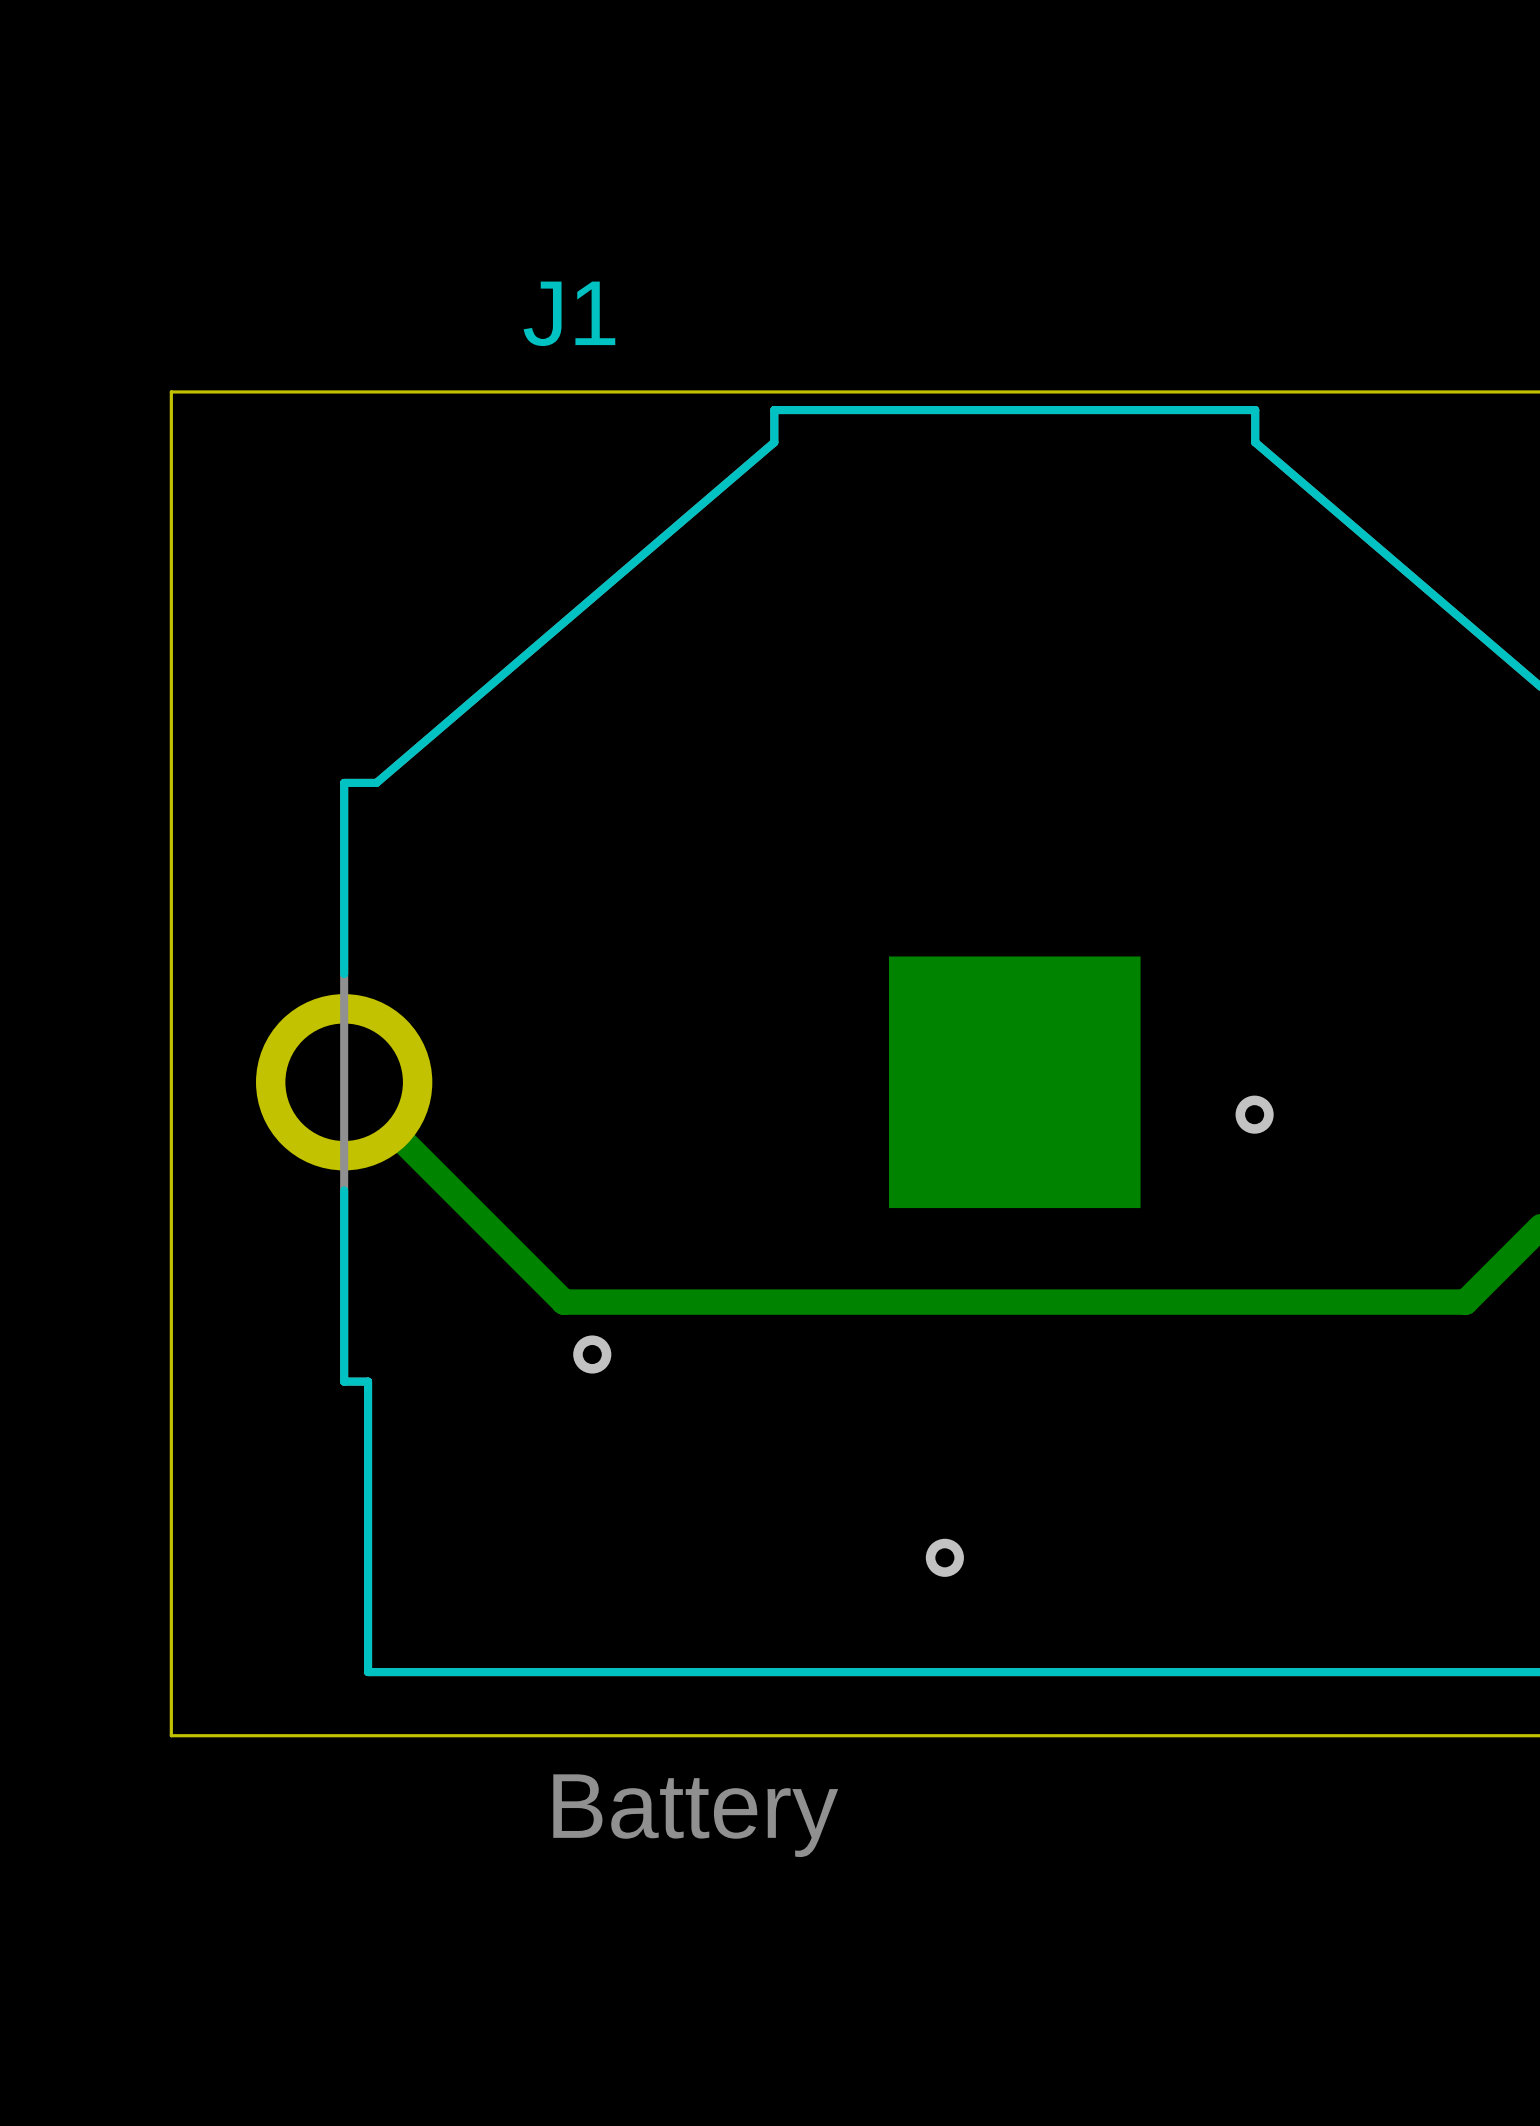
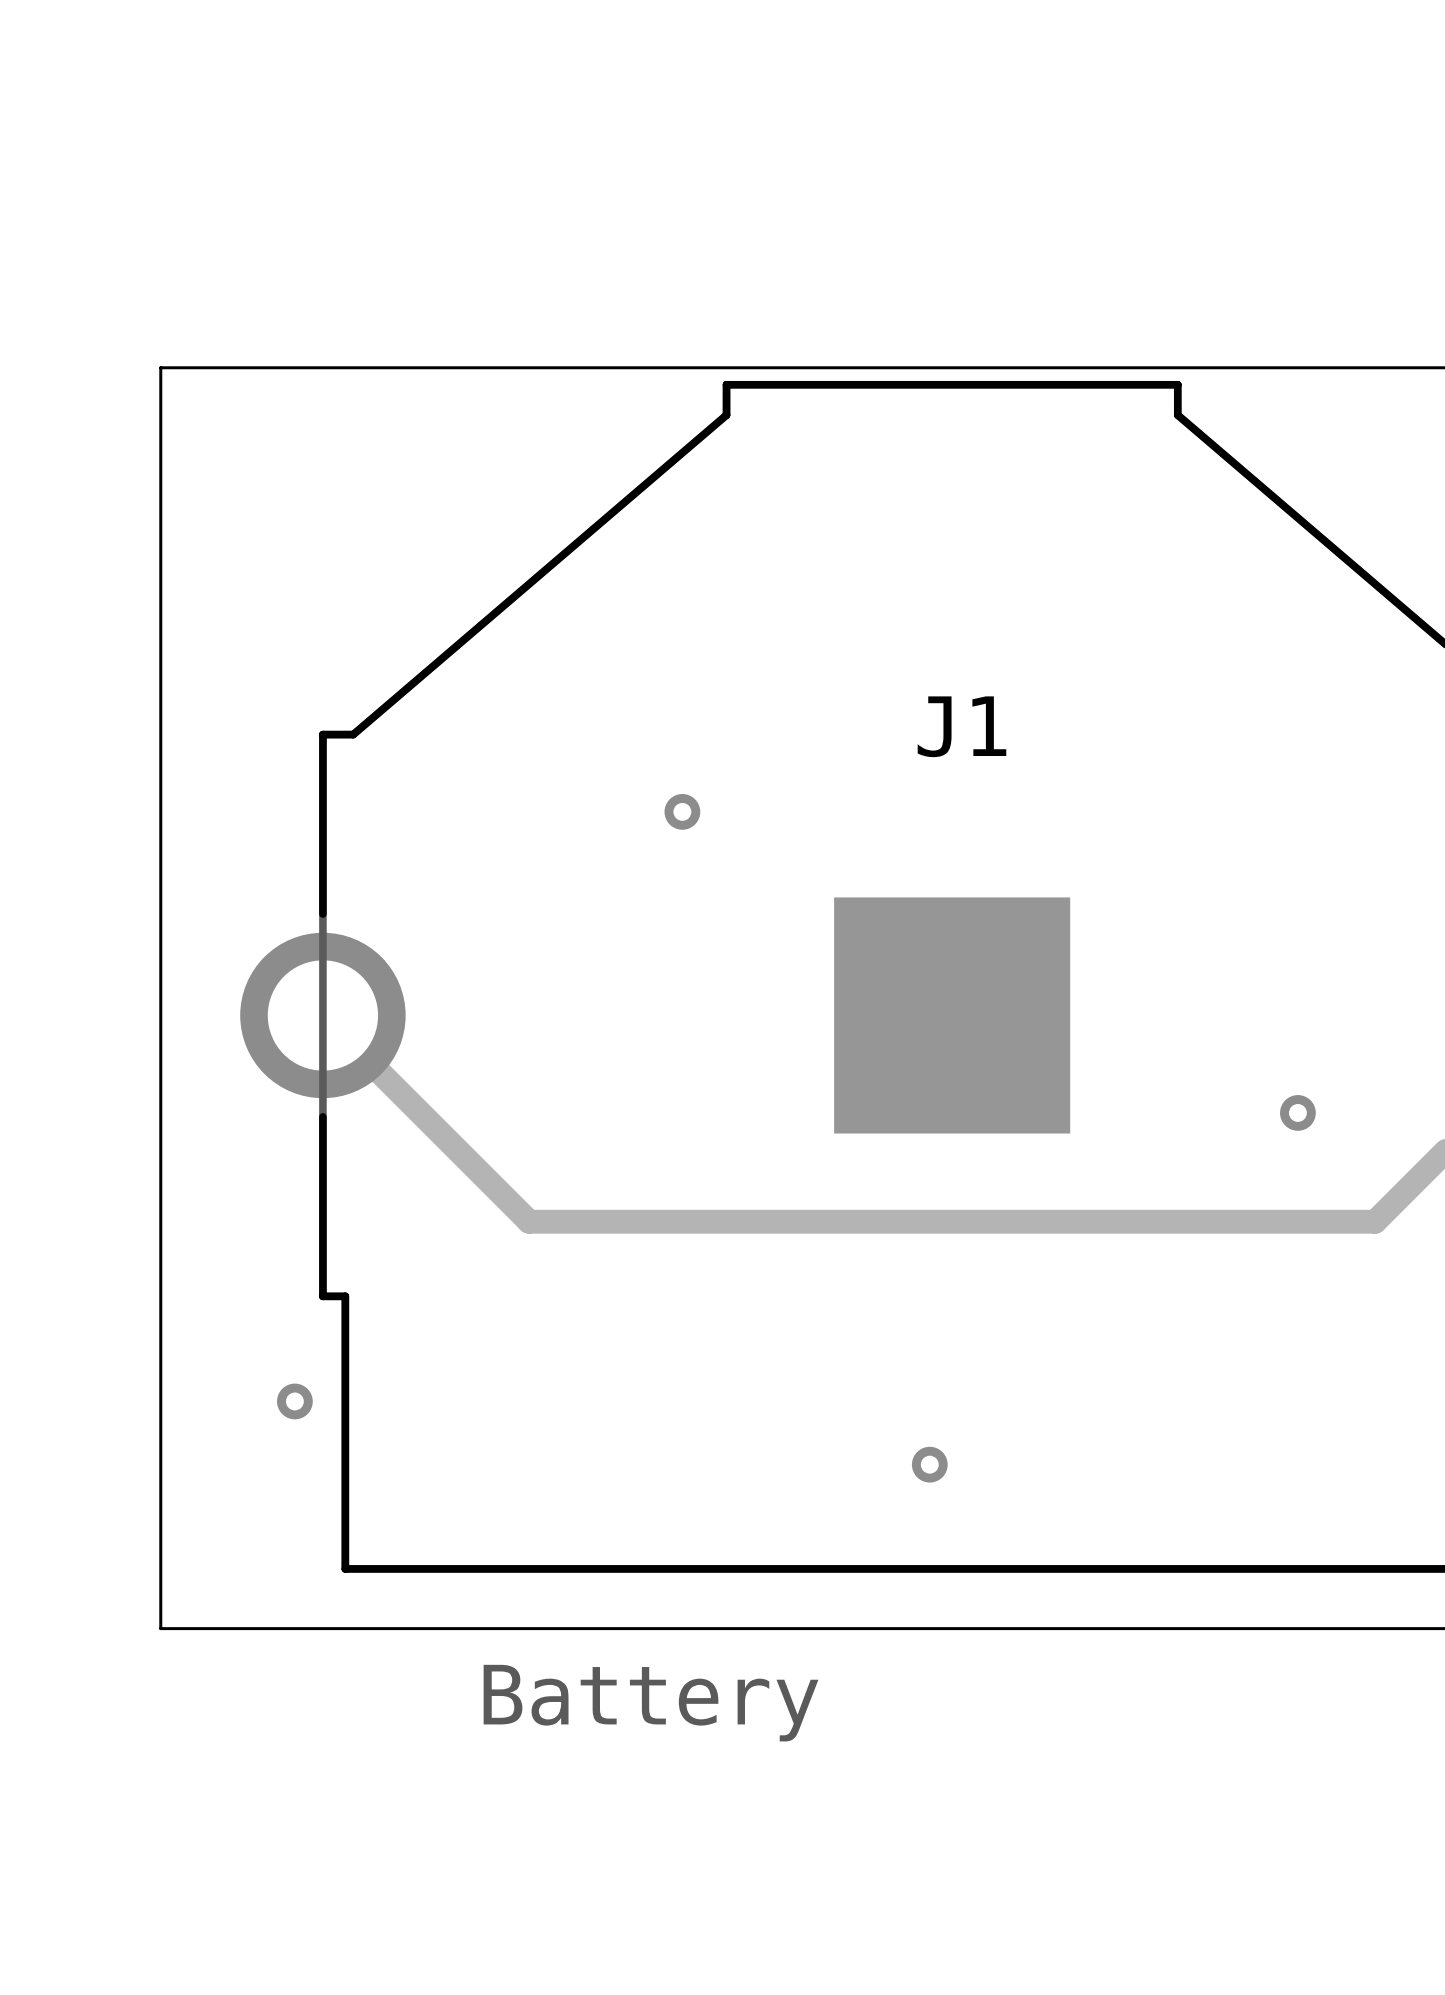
J1 name position: J1 (569, 313) -> J1 (961, 726)
via: none -> (682, 811)
via position: (1254, 1114) -> (1297, 1112)
via: (592, 1354) -> none
via: none -> (294, 1401)
via position: (944, 1557) -> (929, 1464)

